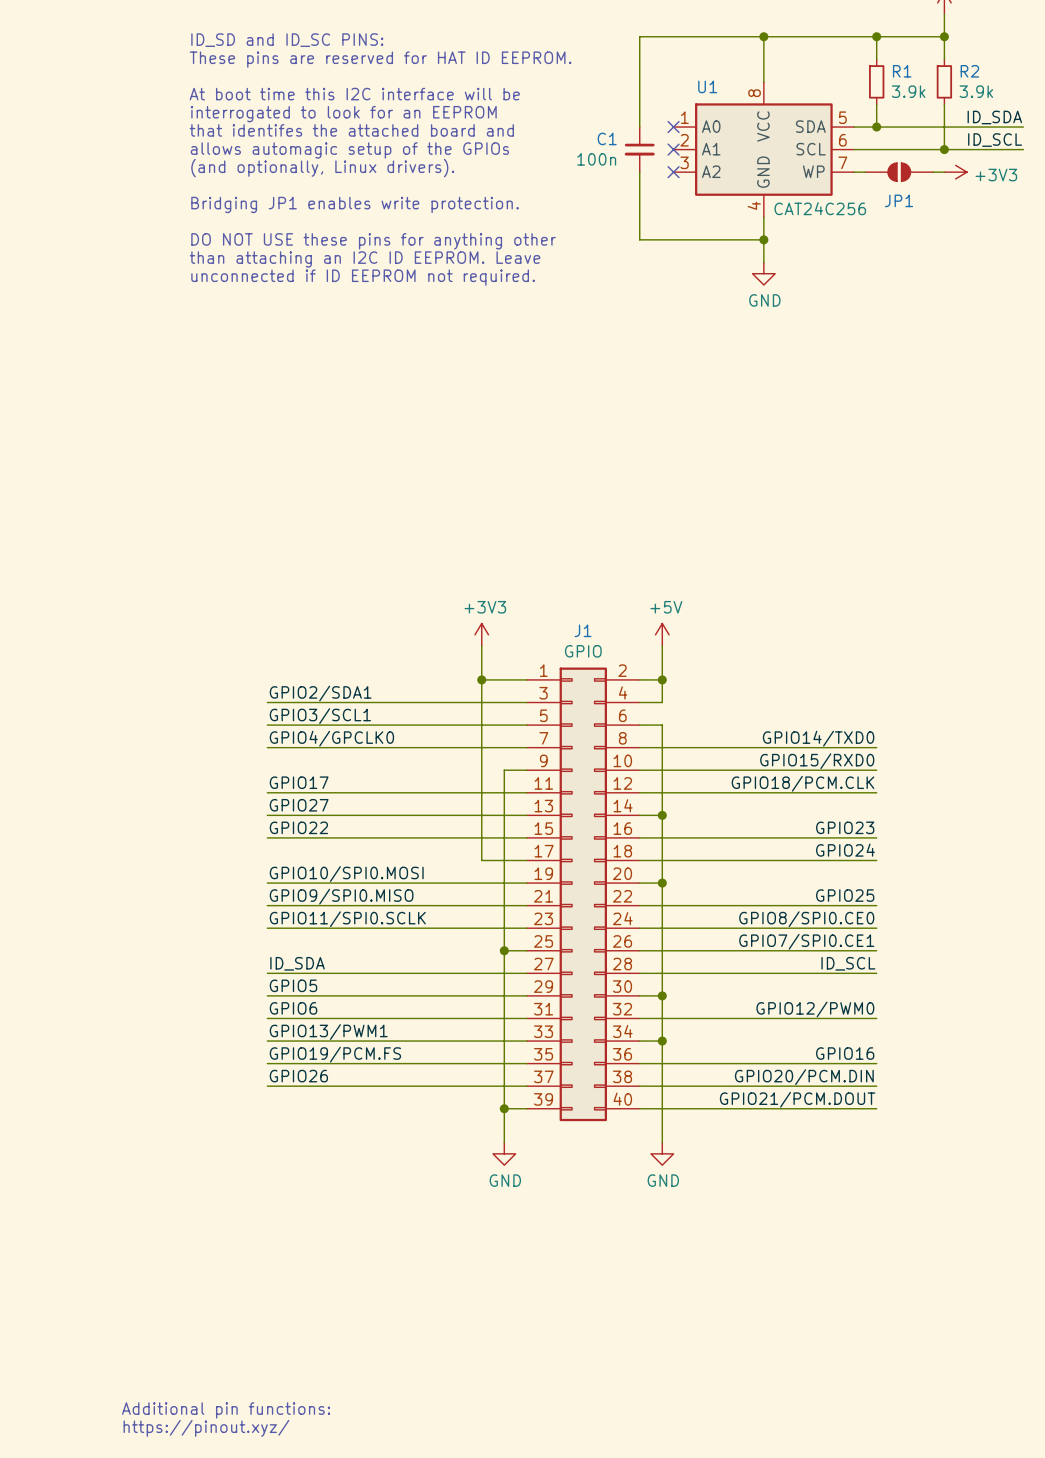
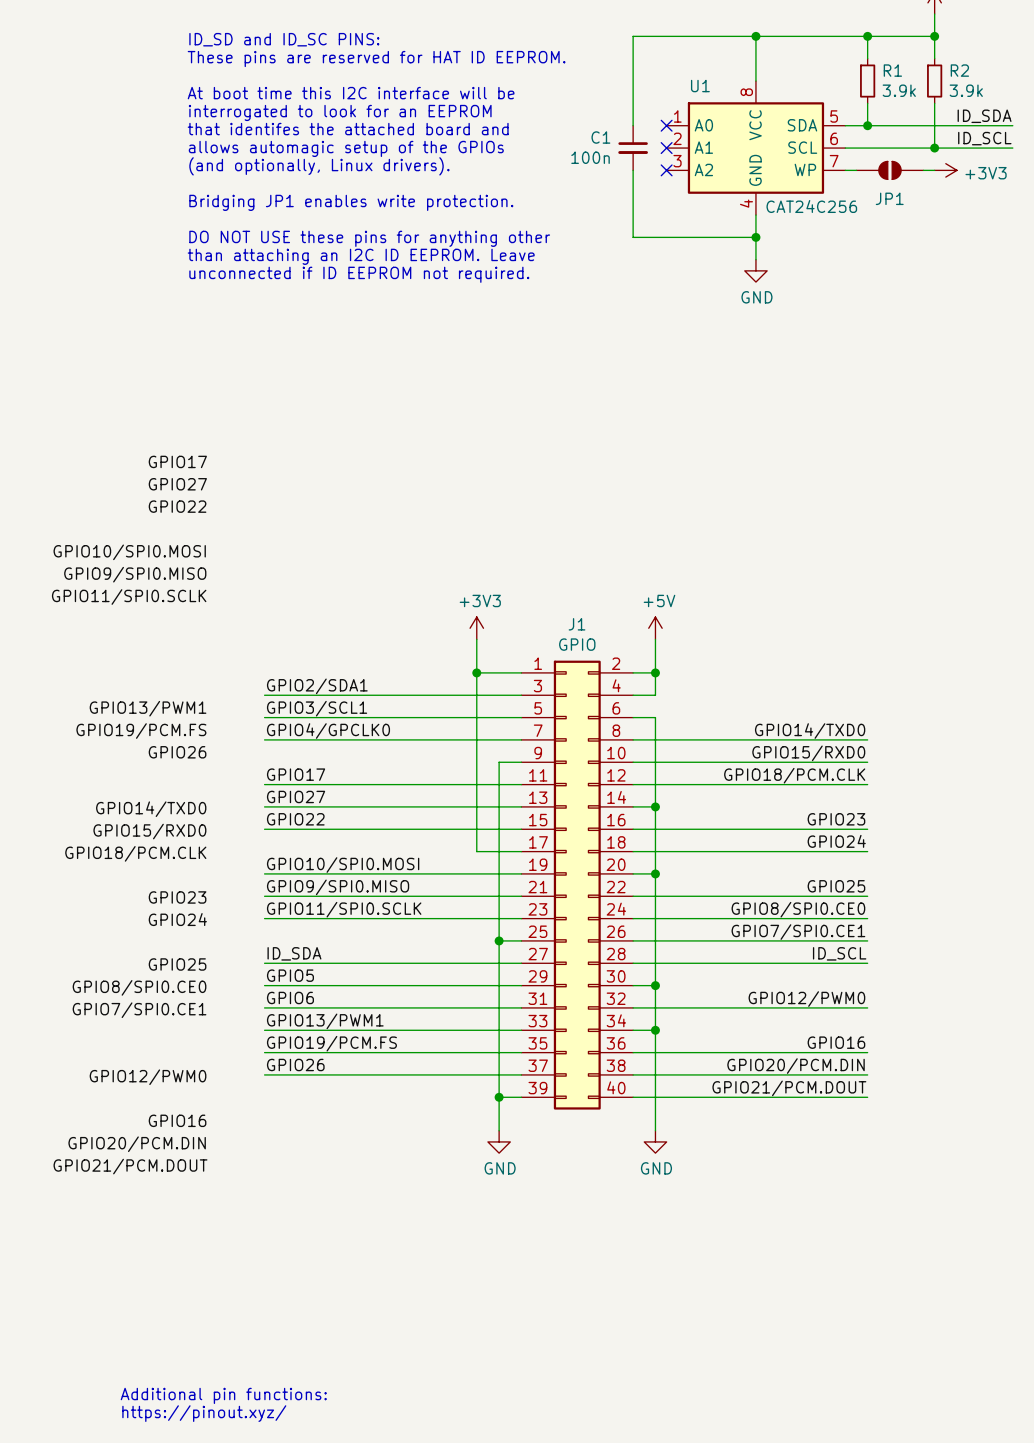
label: none -> GPIO17 (177, 461)
label: none -> GPIO27 (177, 484)
label: none -> GPIO22 (177, 506)
label: none -> GPIO10/SPI0.MOSI (129, 552)
label: none -> GPIO9/SPI0.MISO (135, 574)
label: none -> GPIO11/SPI0.SCLK (129, 597)
label: none -> GPIO13/PWM1 (148, 708)
label: none -> GPIO19/PCM.FS (141, 731)
label: none -> GPIO26 (177, 752)
label: none -> GPIO14/TXD0 (151, 809)
label: none -> GPIO15/RXD0 (149, 831)
label: none -> GPIO18/PCM.CLK (135, 853)
label: none -> GPIO23 (177, 897)
label: none -> GPIO24 (177, 919)
label: none -> GPIO25 (177, 964)
label: none -> GPIO8/SPI0.CE0 (139, 987)
label: none -> GPIO7/SPI0.CE1 (139, 1010)
label: none -> GPIO12/PWM0 (148, 1077)
label: none -> GPIO16 (177, 1120)
label: none -> GPIO20/PCM.DIN (137, 1144)
label: none -> GPIO21/PCM.DOUT (130, 1166)

